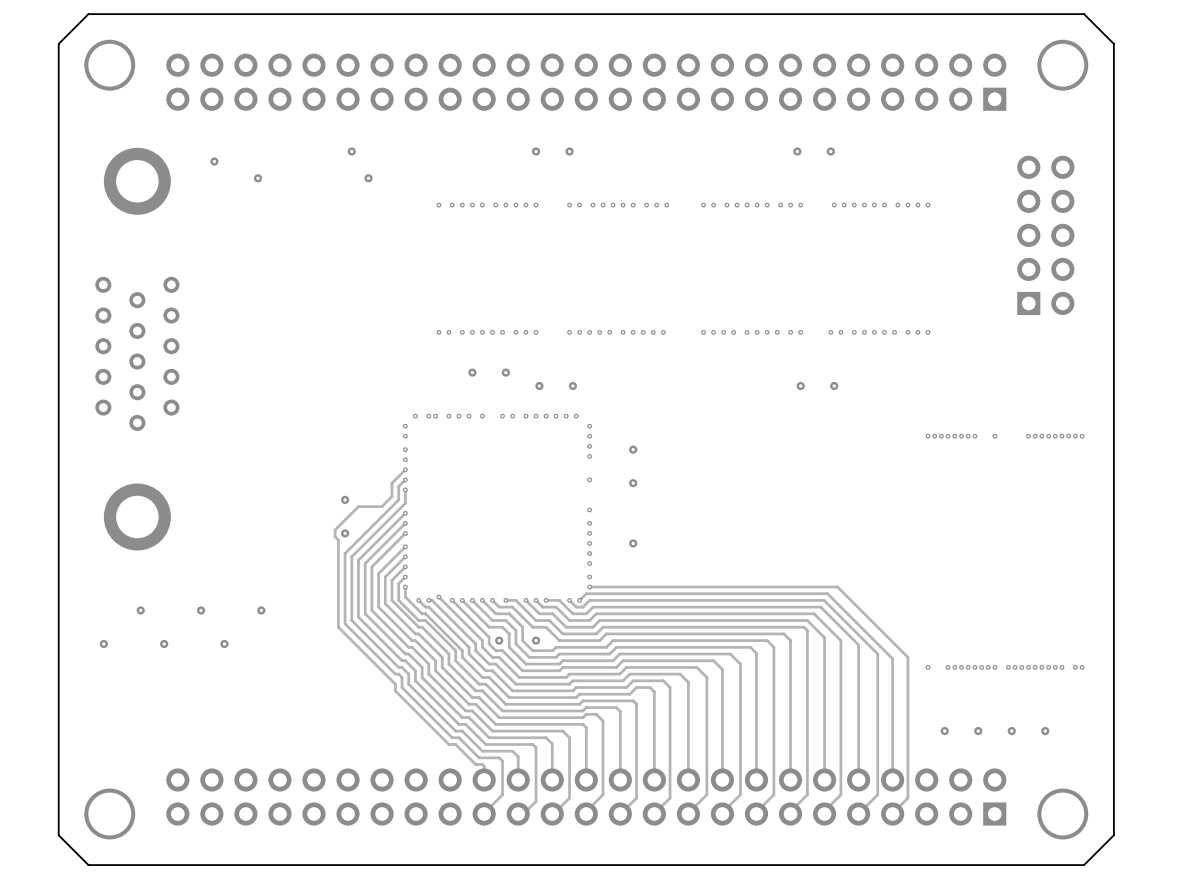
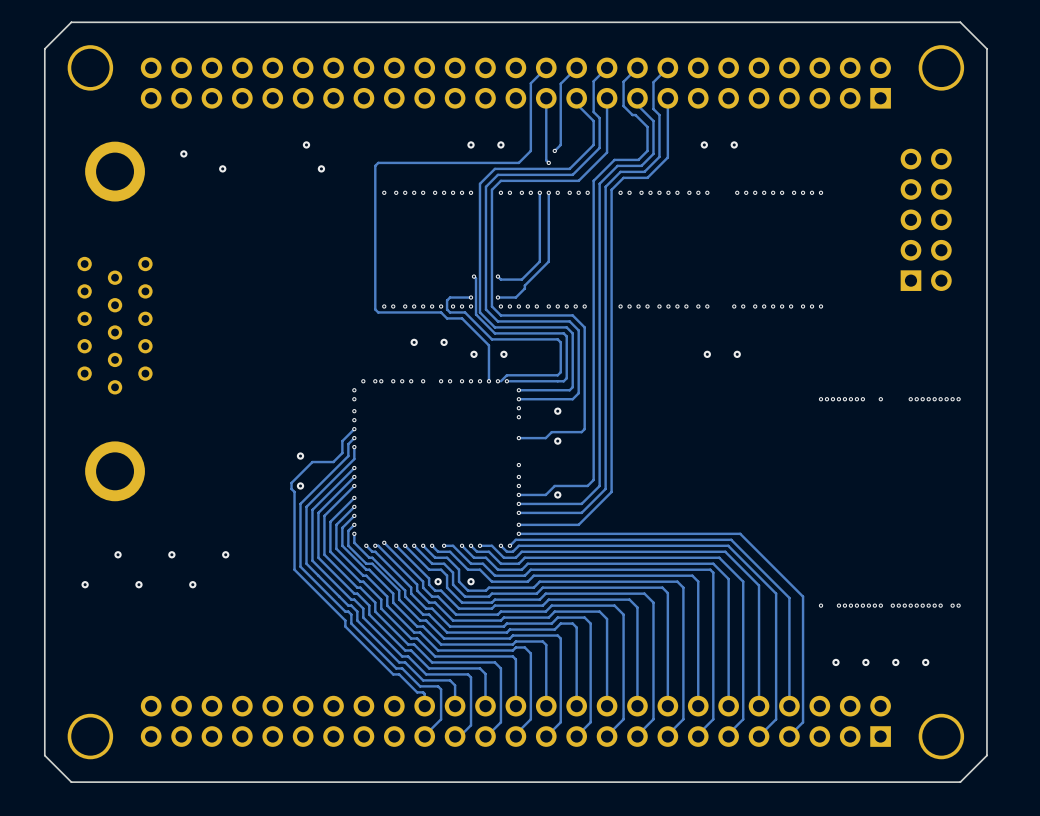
track: none -> (546, 67) (530, 83) (530, 150) (518, 162) (378, 162) (375, 165) (375, 309) (378, 312) (441, 312) (447, 318) (462, 318) (488, 345) (488, 381)
track: none -> (576, 67) (560, 83) (560, 144) (554, 150)
track: none -> (607, 67) (593, 81) (593, 112) (599, 118) (599, 147) (572, 174) (497, 174) (485, 186) (485, 309) (497, 321) (569, 321) (578, 330) (578, 393) (572, 399) (518, 399)
track: none -> (637, 67) (623, 81) (623, 106) (647, 127) (647, 150) (638, 159) (614, 159) (593, 180) (593, 479) (587, 485) (554, 485) (545, 494) (518, 494)
track: none -> (667, 67) (653, 82) (653, 109) (659, 115) (659, 156) (644, 171) (620, 171) (605, 186) (605, 488) (581, 512) (518, 512)
track: none -> (546, 98) (546, 160) (548, 162)
track: none -> (576, 98) (576, 104) (593, 121) (593, 144) (569, 168) (494, 168) (479, 183) (479, 312) (494, 327) (566, 327) (572, 333) (572, 387) (569, 390) (518, 390)
track: none -> (607, 98) (607, 152) (578, 180) (500, 180) (491, 189) (491, 306) (500, 315) (572, 315) (584, 327) (584, 429) (581, 432) (551, 432) (545, 438) (518, 438)
track: none -> (637, 98) (637, 104) (653, 121) (653, 153) (641, 165) (617, 165) (599, 183) (599, 485) (581, 503) (518, 503)
track: none -> (667, 98) (667, 157) (647, 177) (623, 177) (611, 189) (611, 491) (578, 524) (518, 524)
via: none -> (554, 150)
via: none -> (548, 162)
track: none -> (539, 192) (539, 261) (521, 279) (500, 279) (497, 276)
track: none -> (548, 192) (548, 261) (515, 297) (497, 297)
track: none -> (474, 276) (476, 278) (476, 314) (494, 333) (563, 333) (566, 336) (566, 378) (563, 381) (509, 381)
via: none -> (474, 276)
via: none -> (497, 276)
track: none -> (471, 297) (450, 297) (447, 300) (447, 309) (450, 312) (465, 312) (491, 339) (557, 339) (560, 342) (560, 372) (557, 375) (506, 375) (500, 381)
via: none -> (471, 297)
via: none -> (497, 297)

